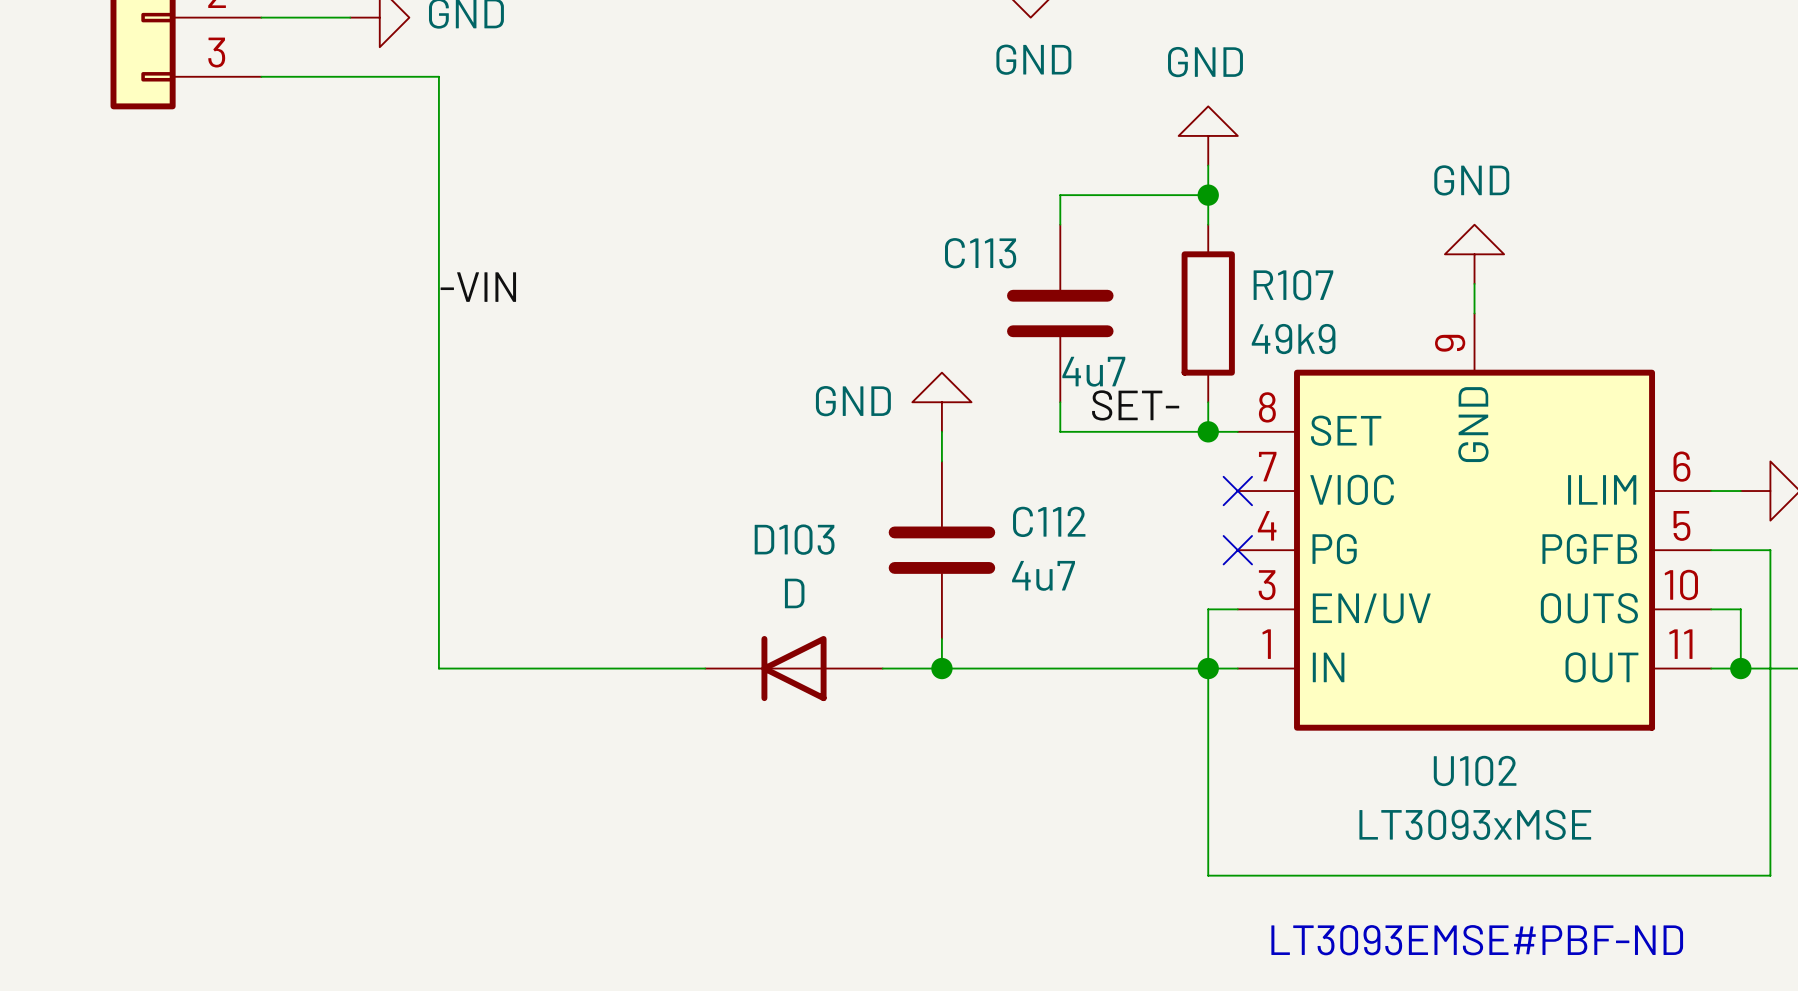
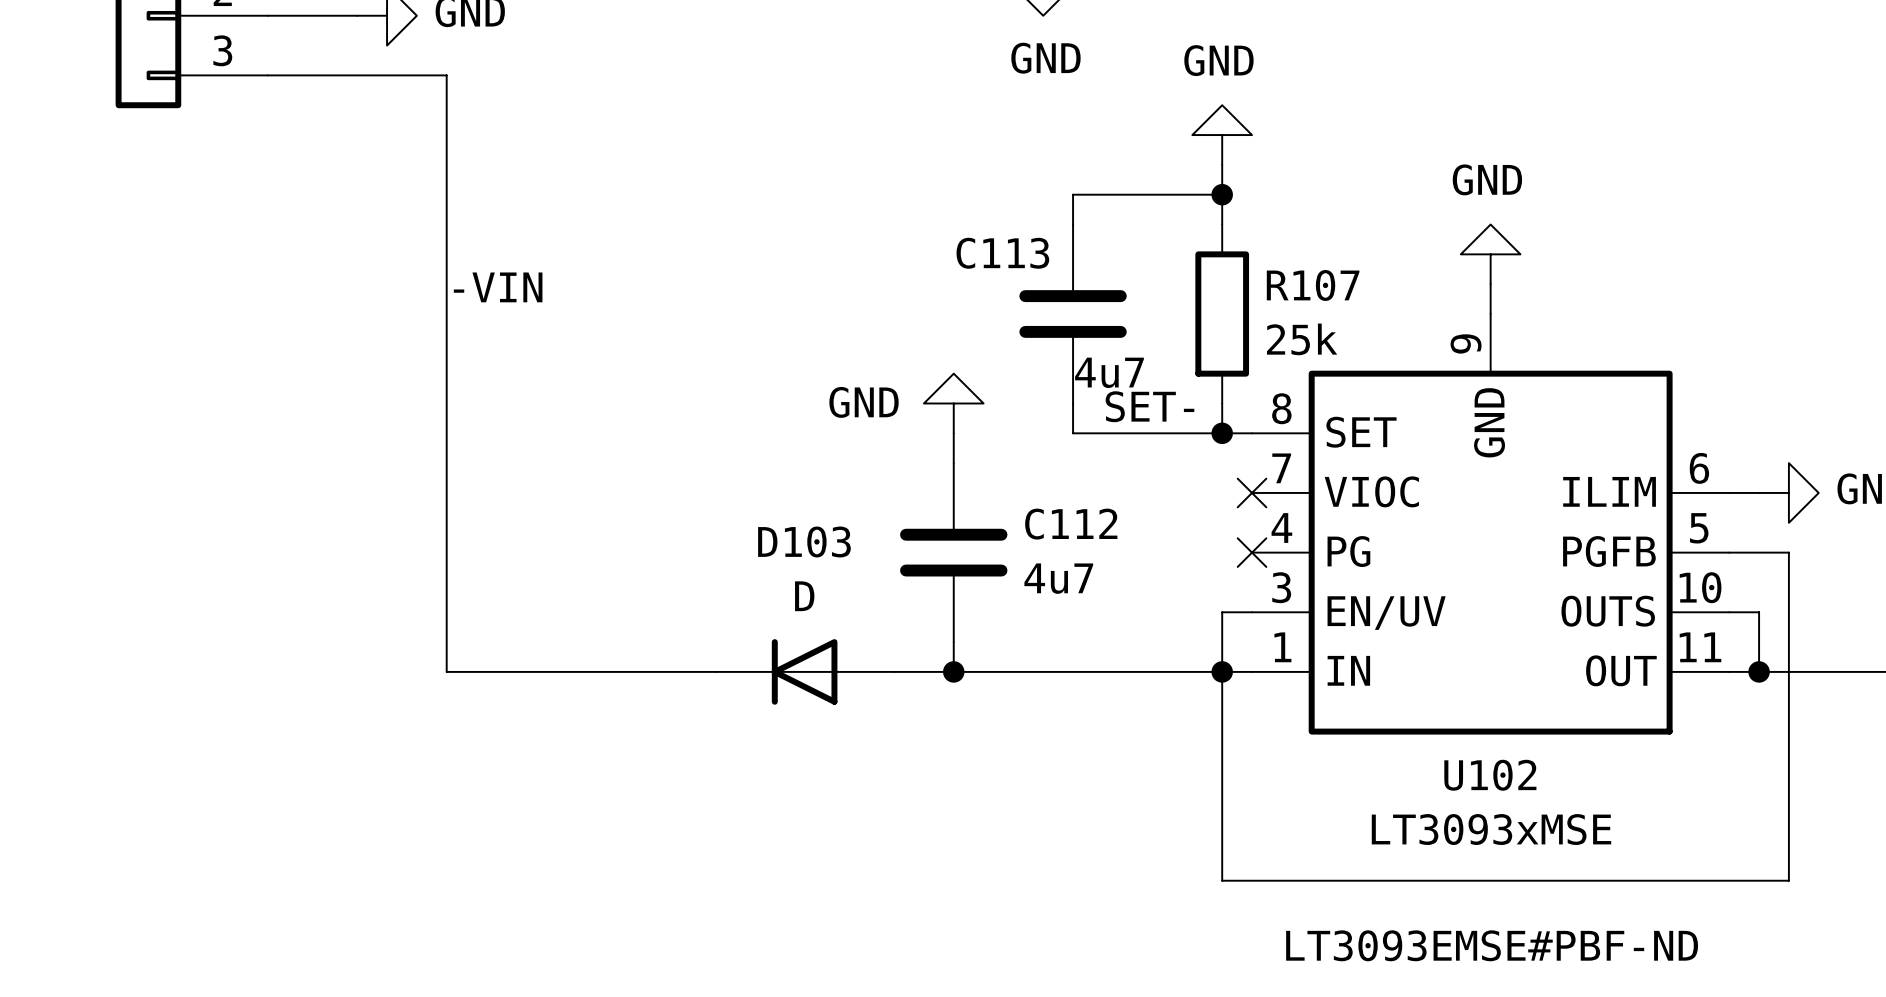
R107 value: 49k9 (1293, 339) -> 25k (1302, 339)

